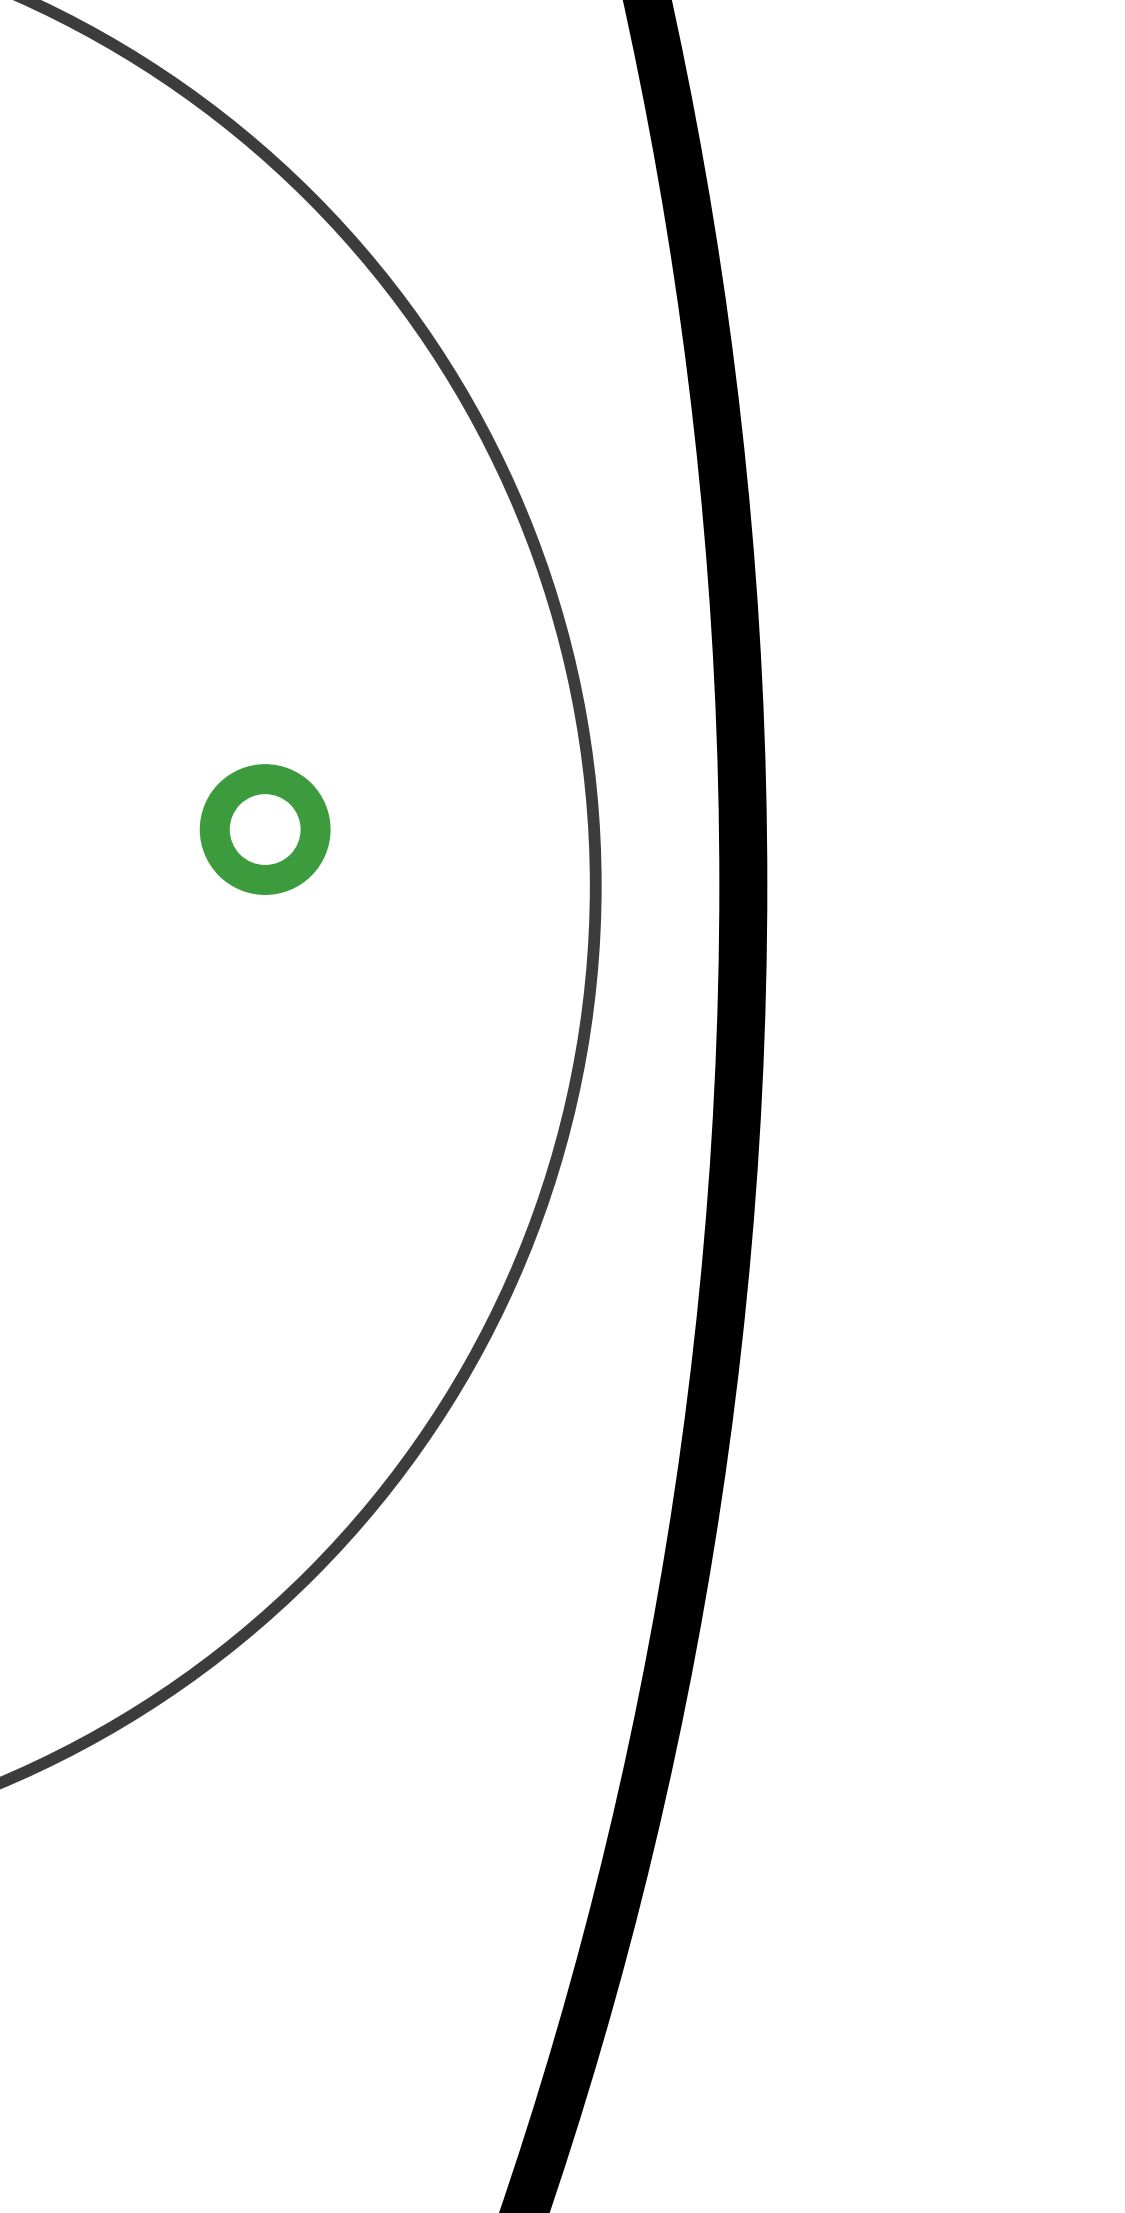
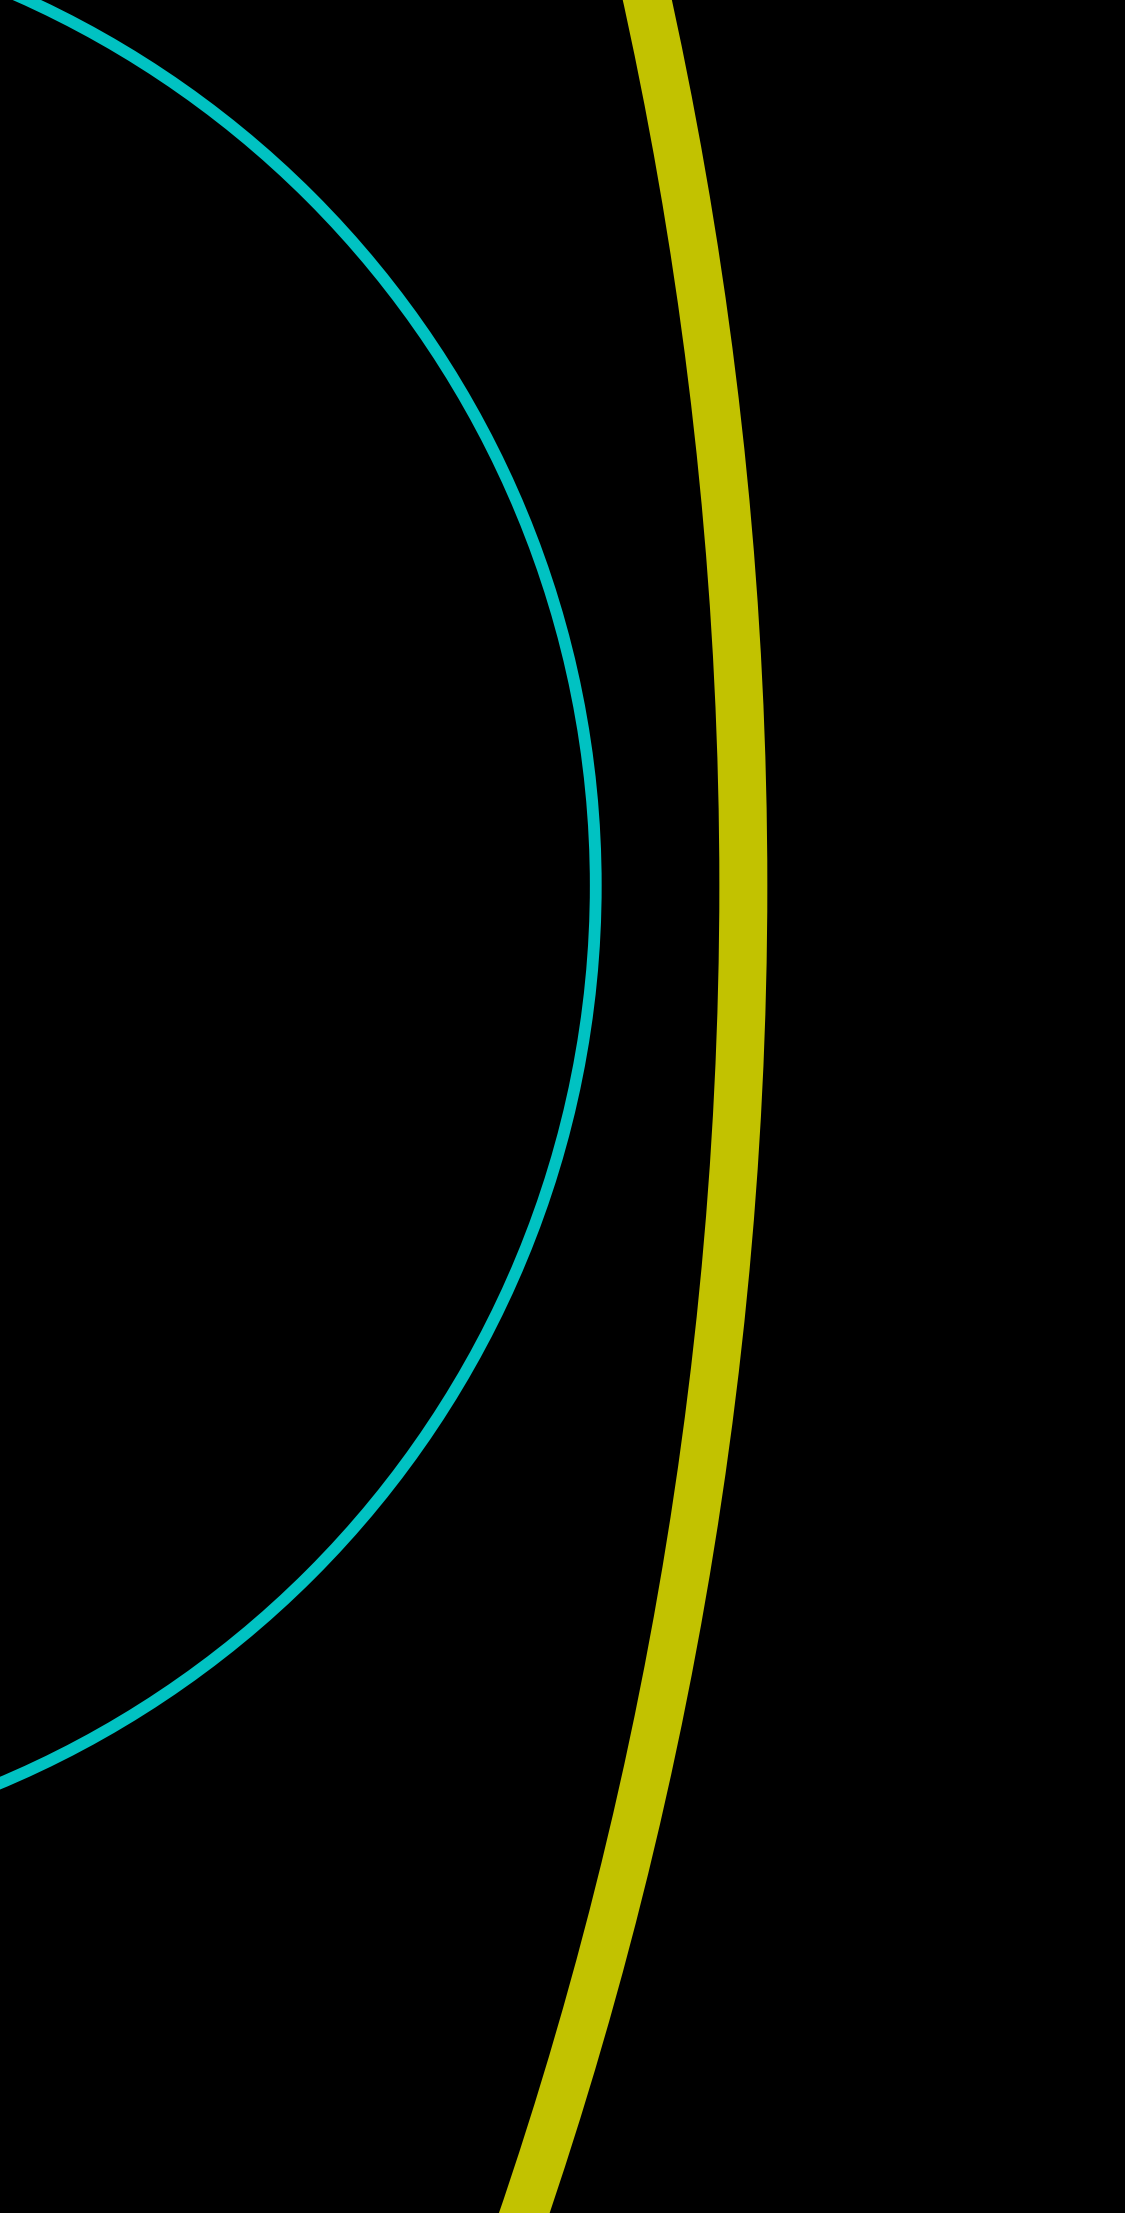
via: (265, 829) -> none

